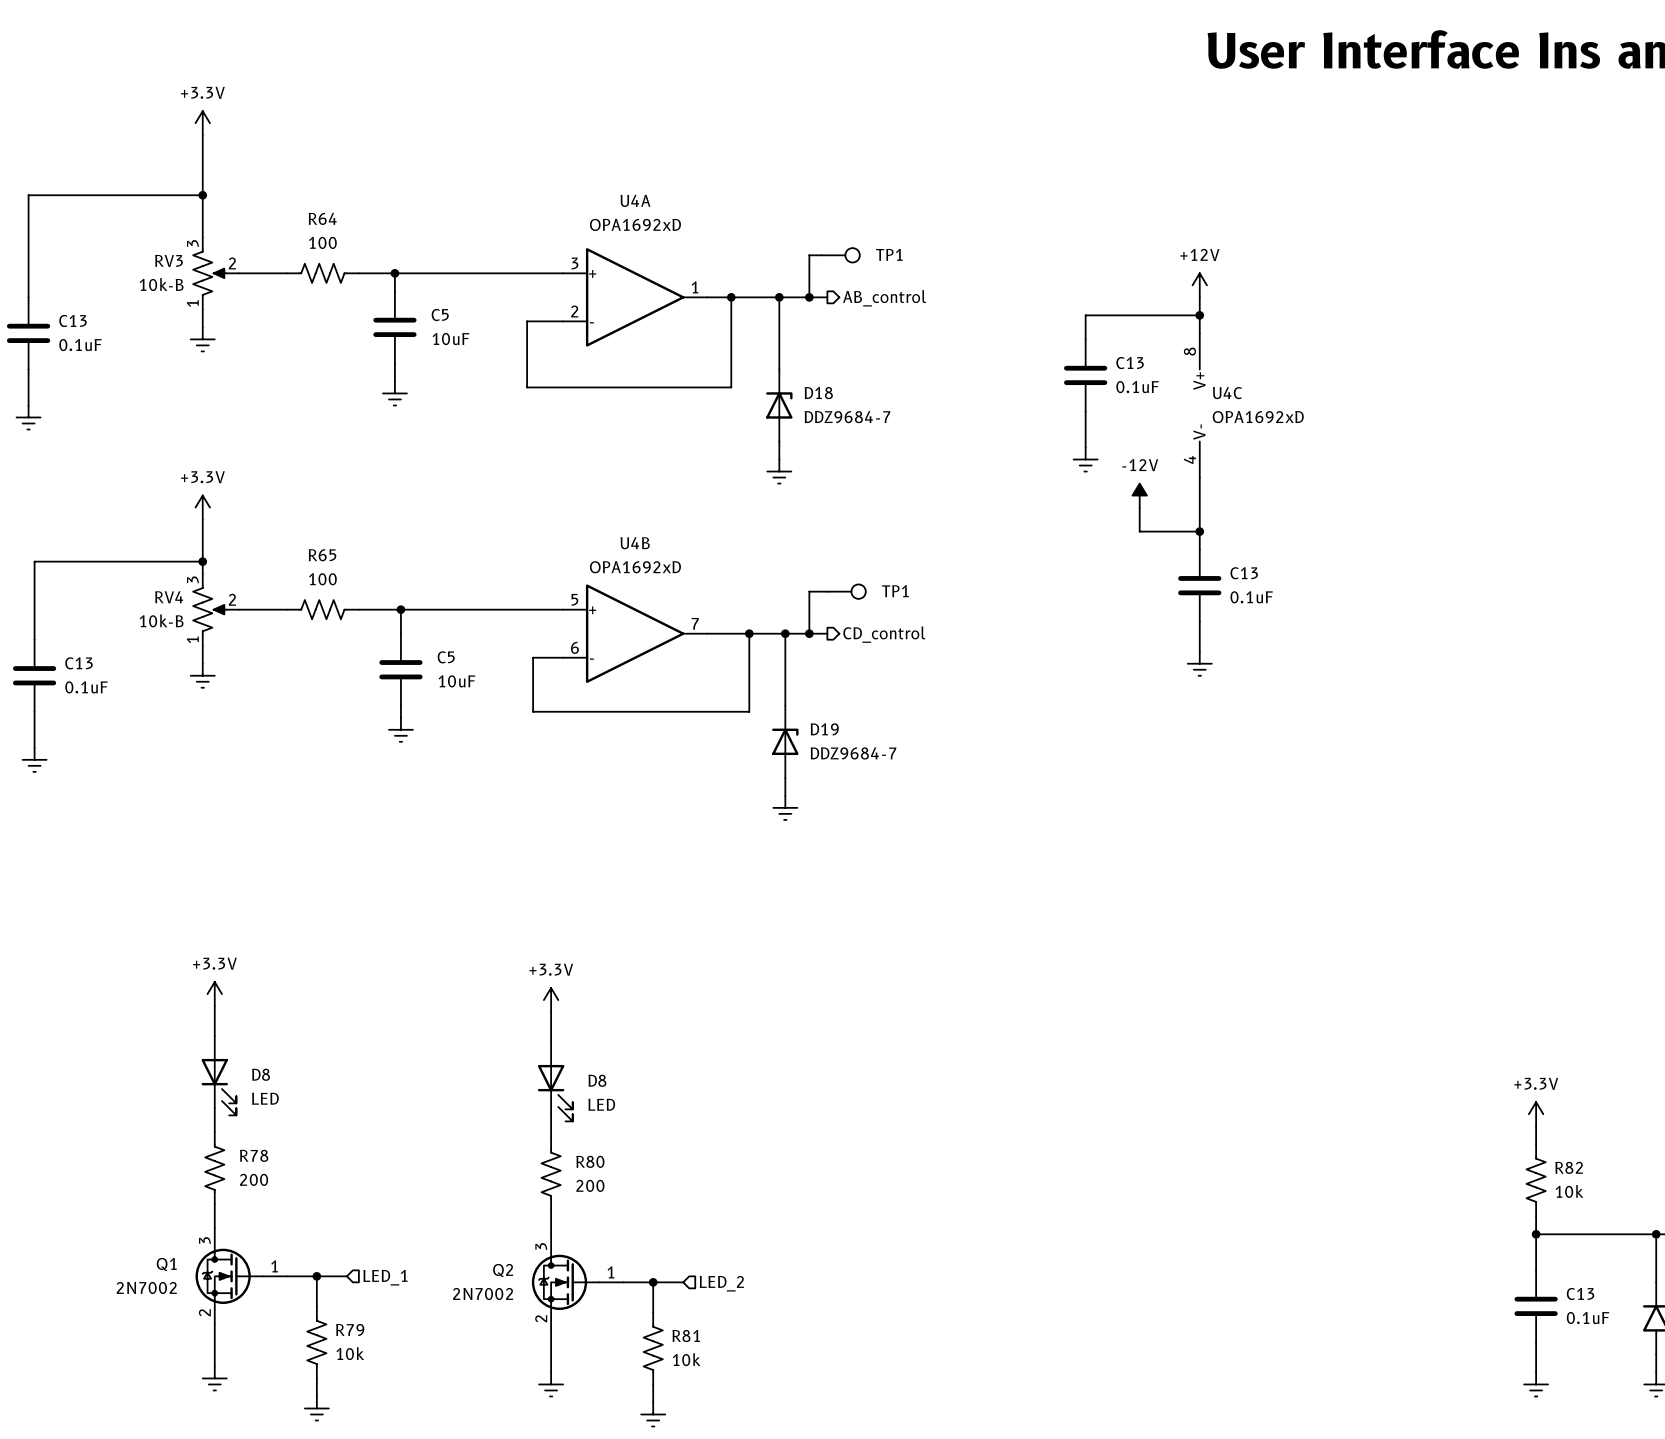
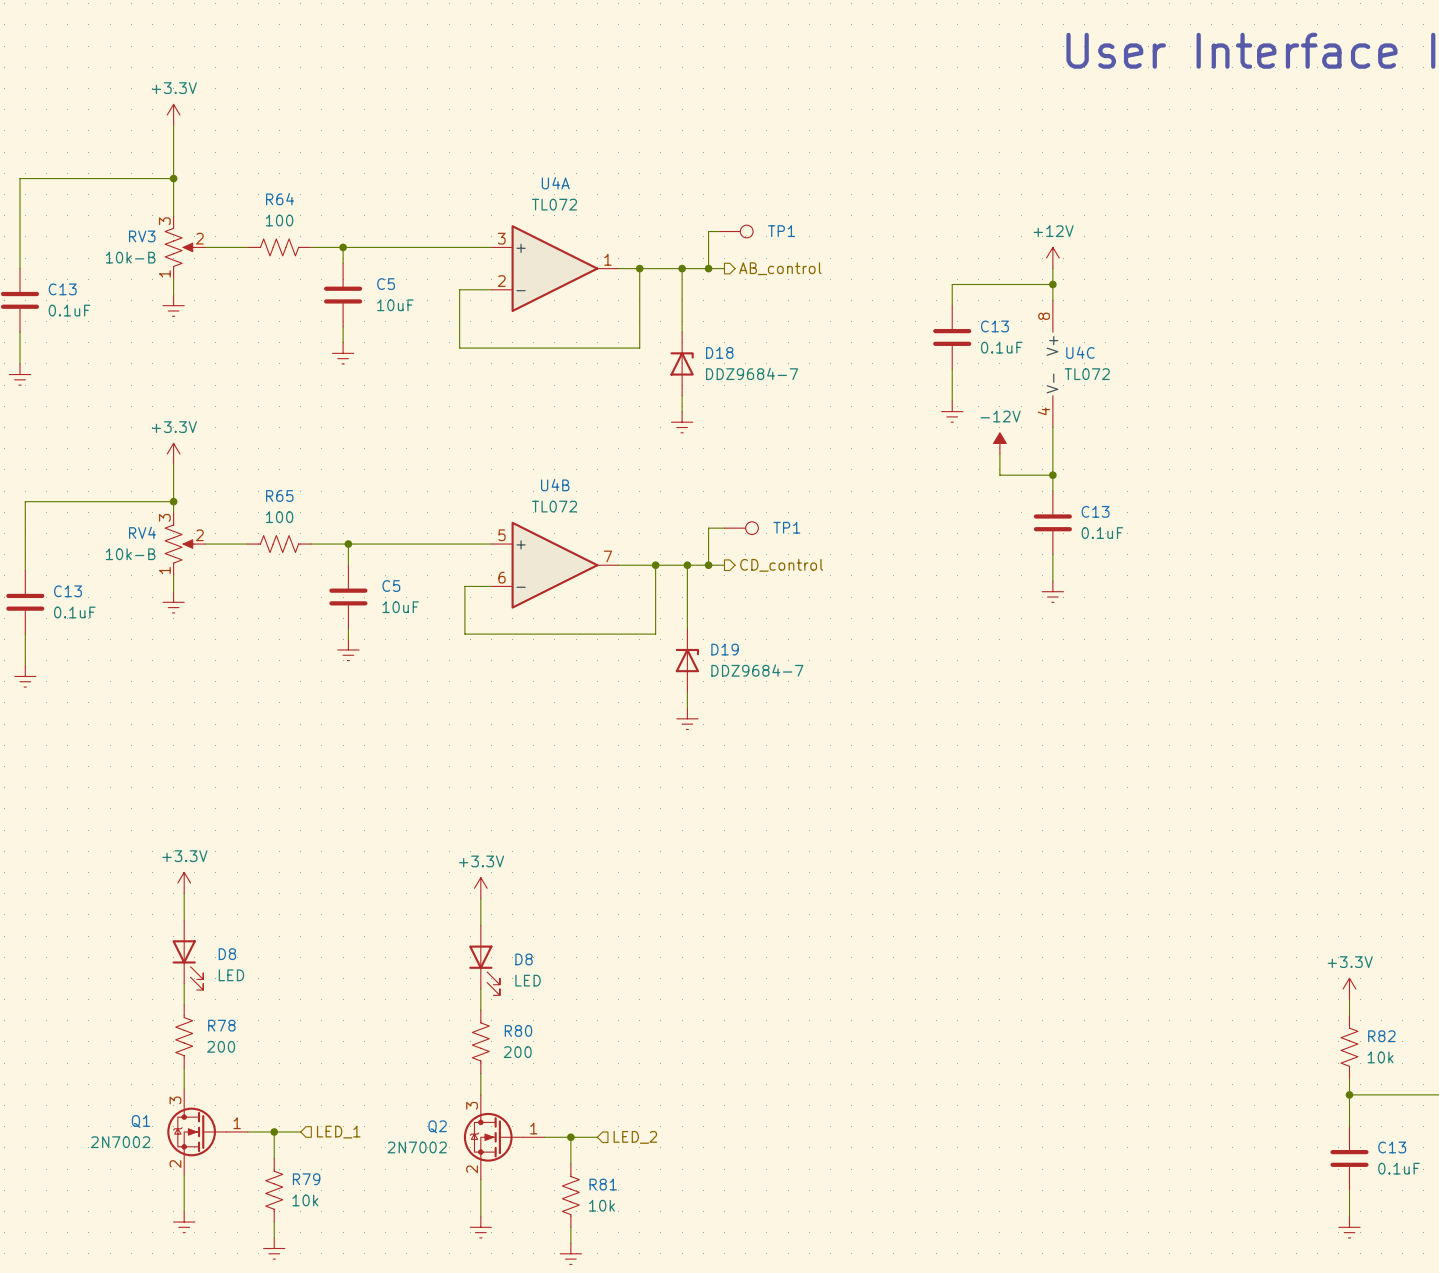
U4A value: OPA1692xD (635, 224) -> TL072 (554, 204)
U4C value: OPA1692xD (1258, 417) -> TL072 (1087, 374)
U4B value: OPA1692xD (635, 567) -> TL072 (554, 506)

